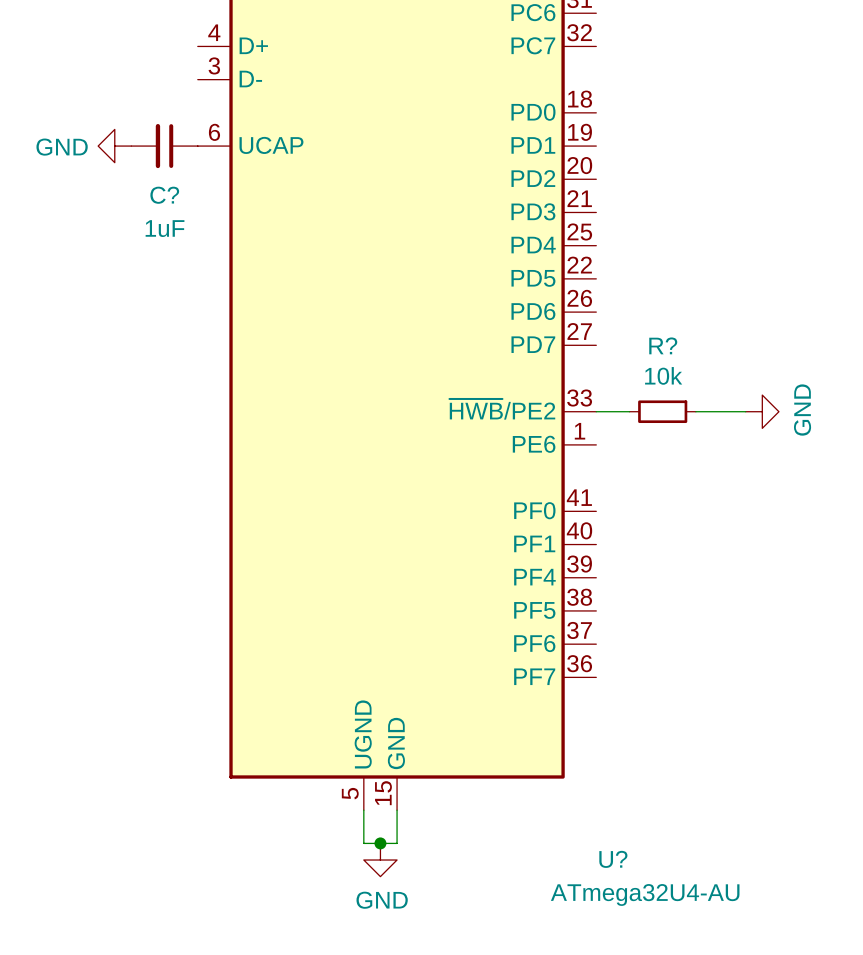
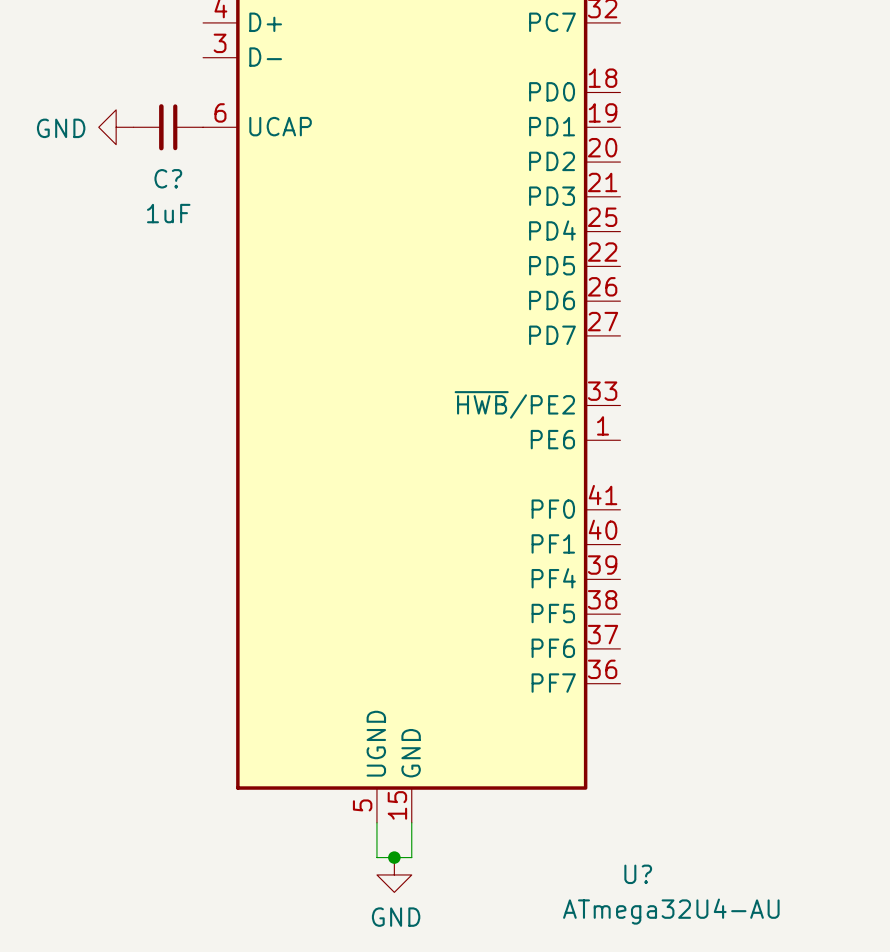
wire: (596, 411) (629, 411) -> none
R?: 10k (662, 411) -> none
wire: (695, 411) (745, 411) -> none
power symbol: GND (762, 411) -> none

